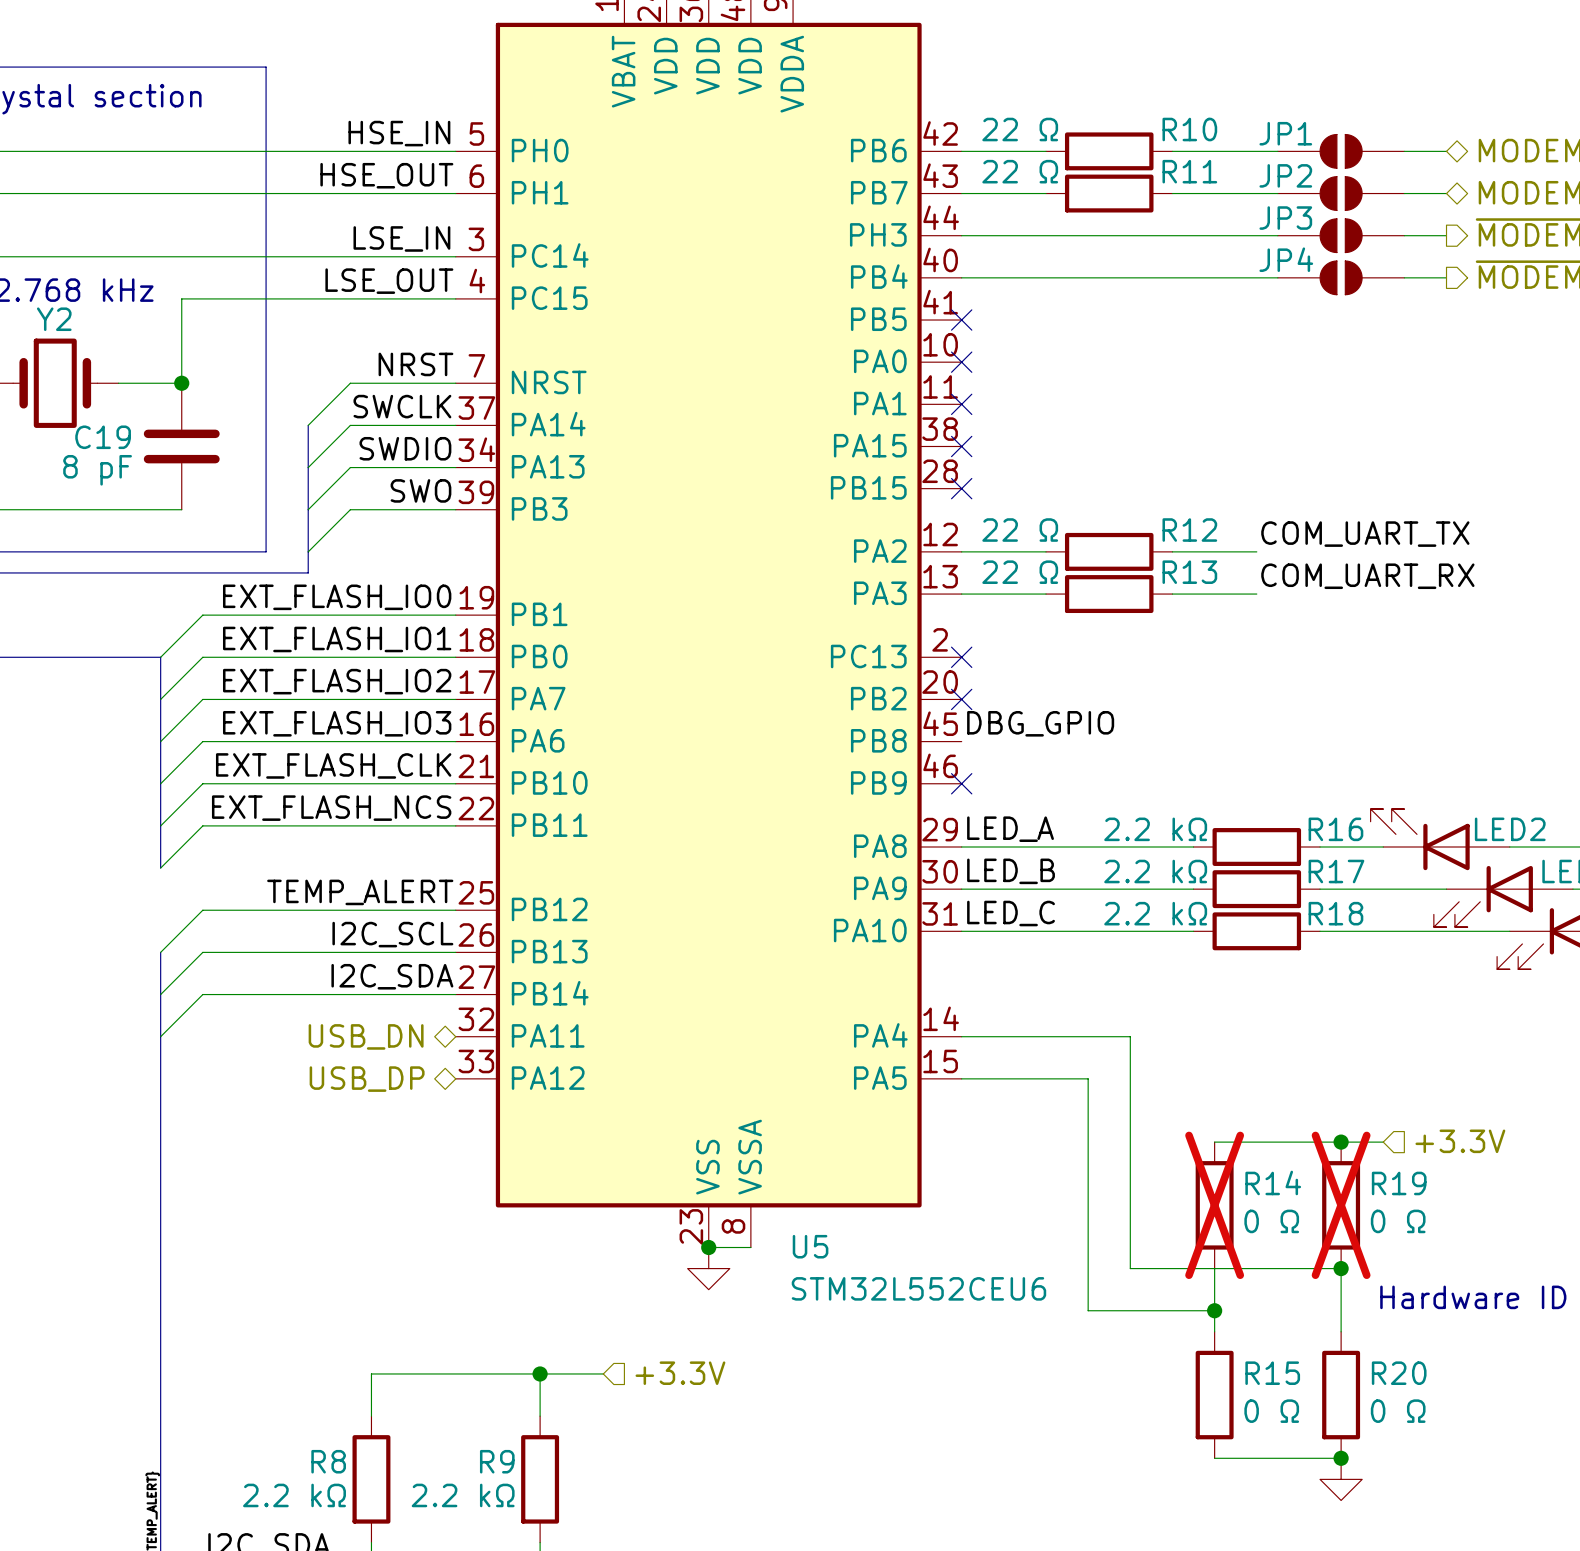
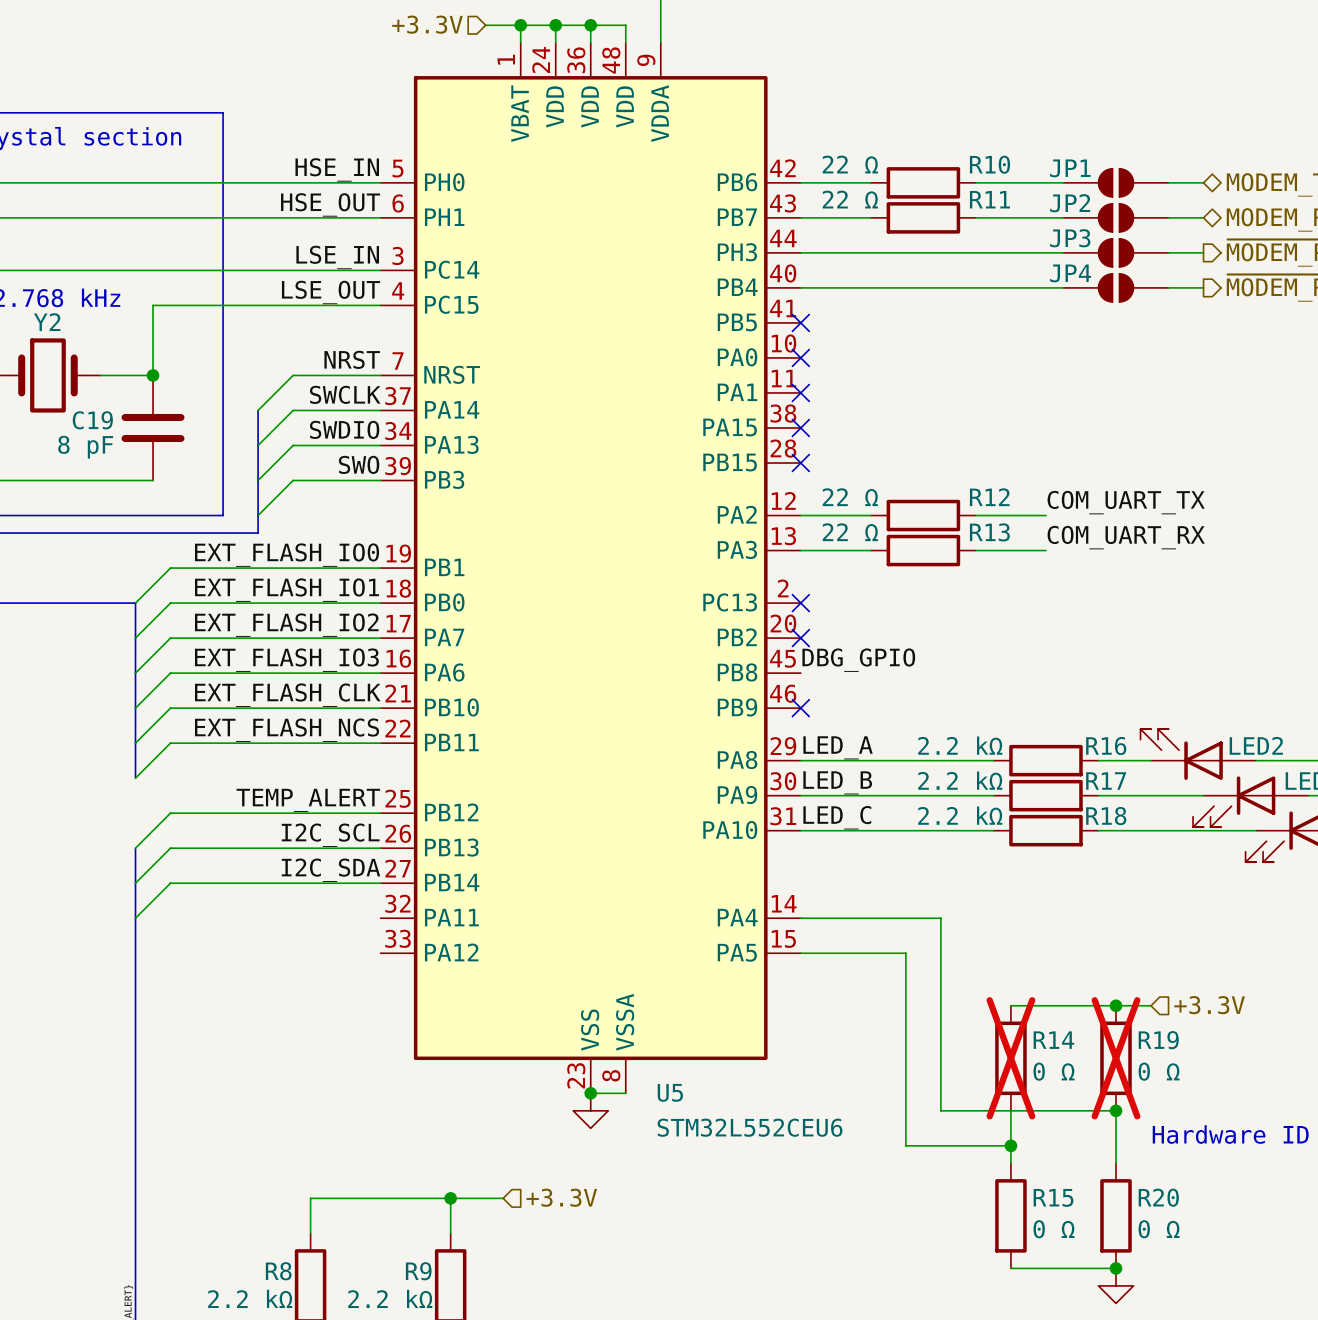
hierarchical label: USB_DN (366, 1036) -> none
hierarchical label: USB_DP (367, 1079) -> none

